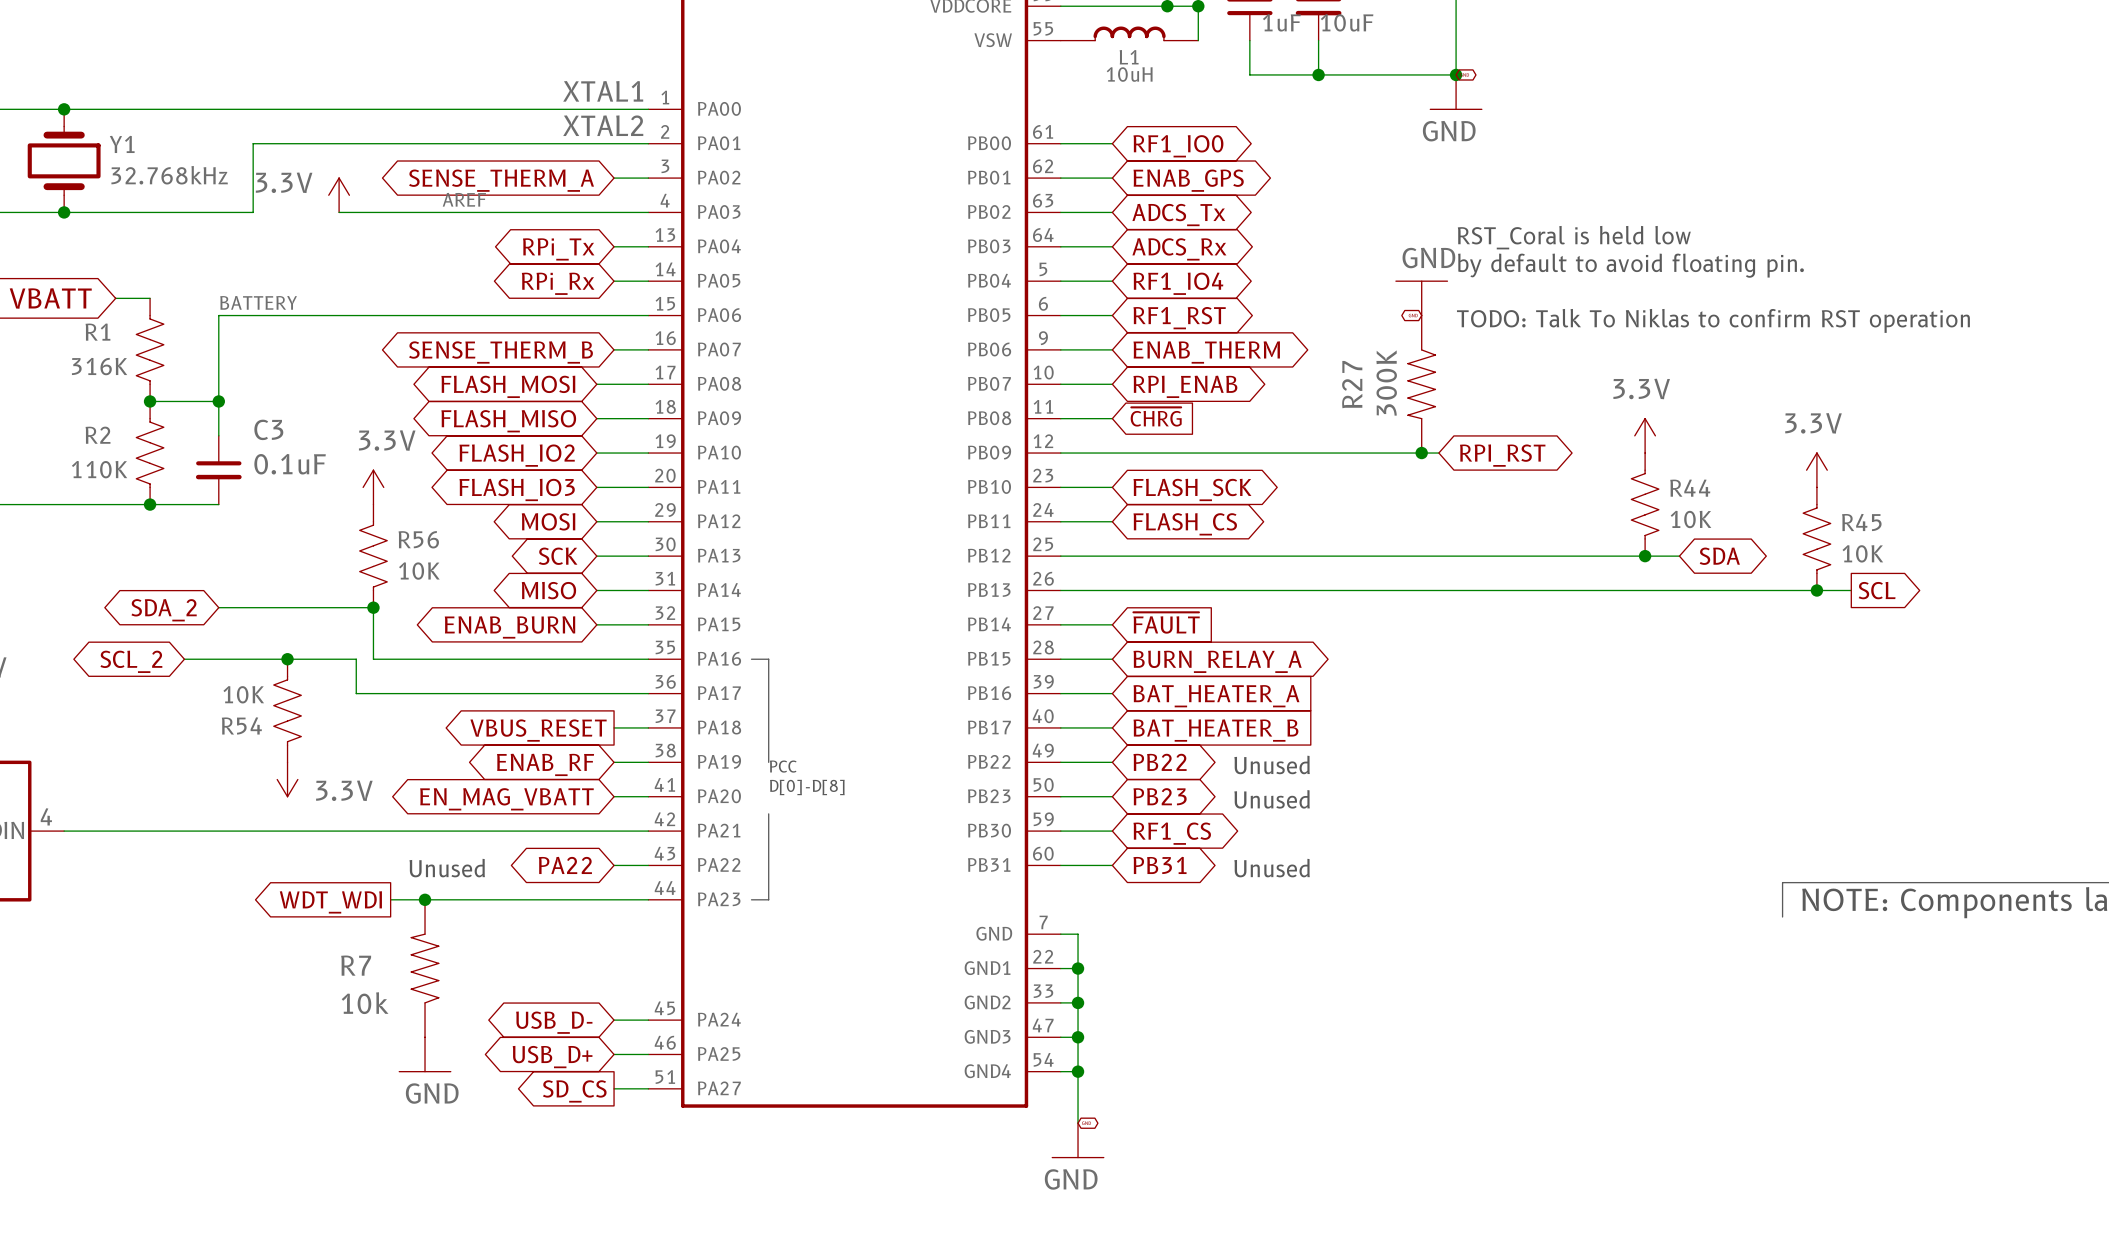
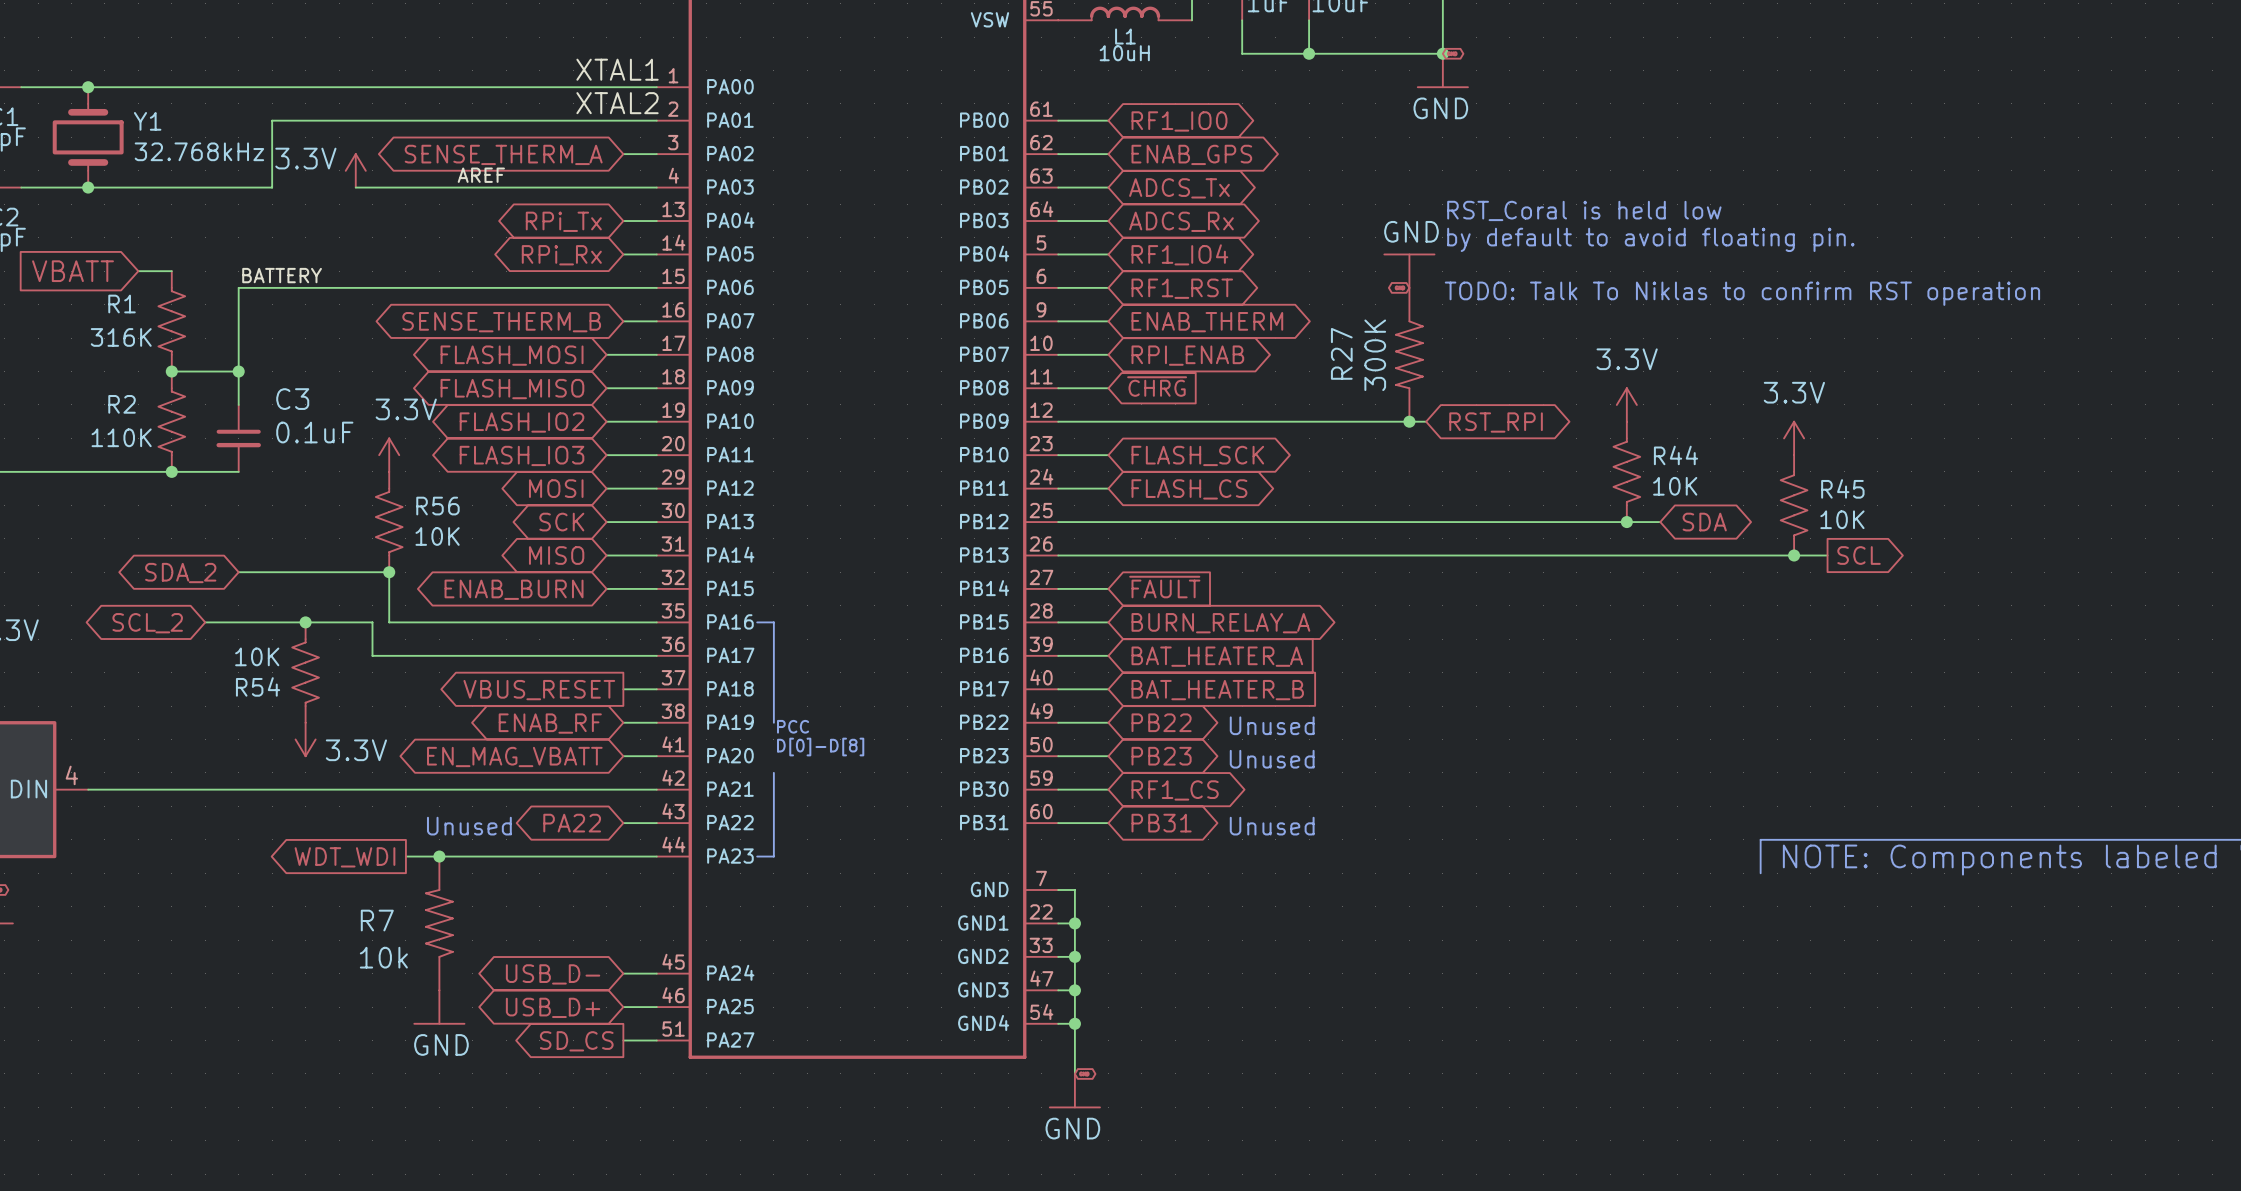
global label: RPI_RST (1502, 455) -> RST_RPI (1496, 422)

